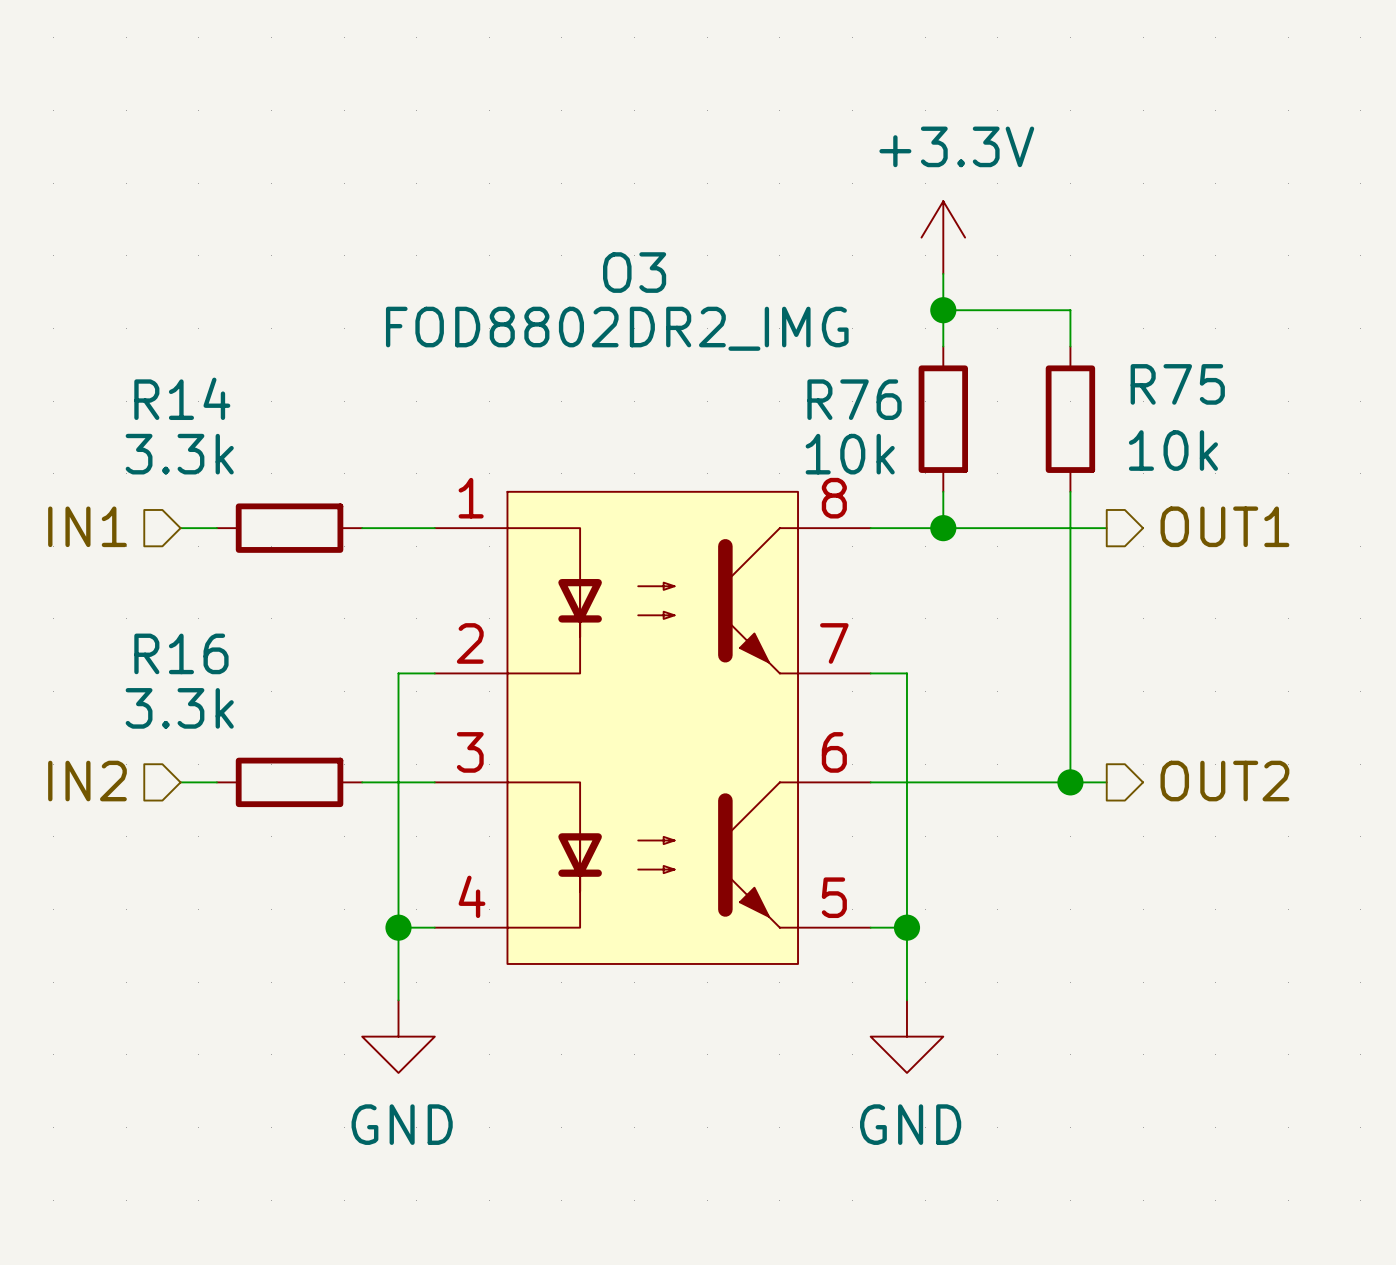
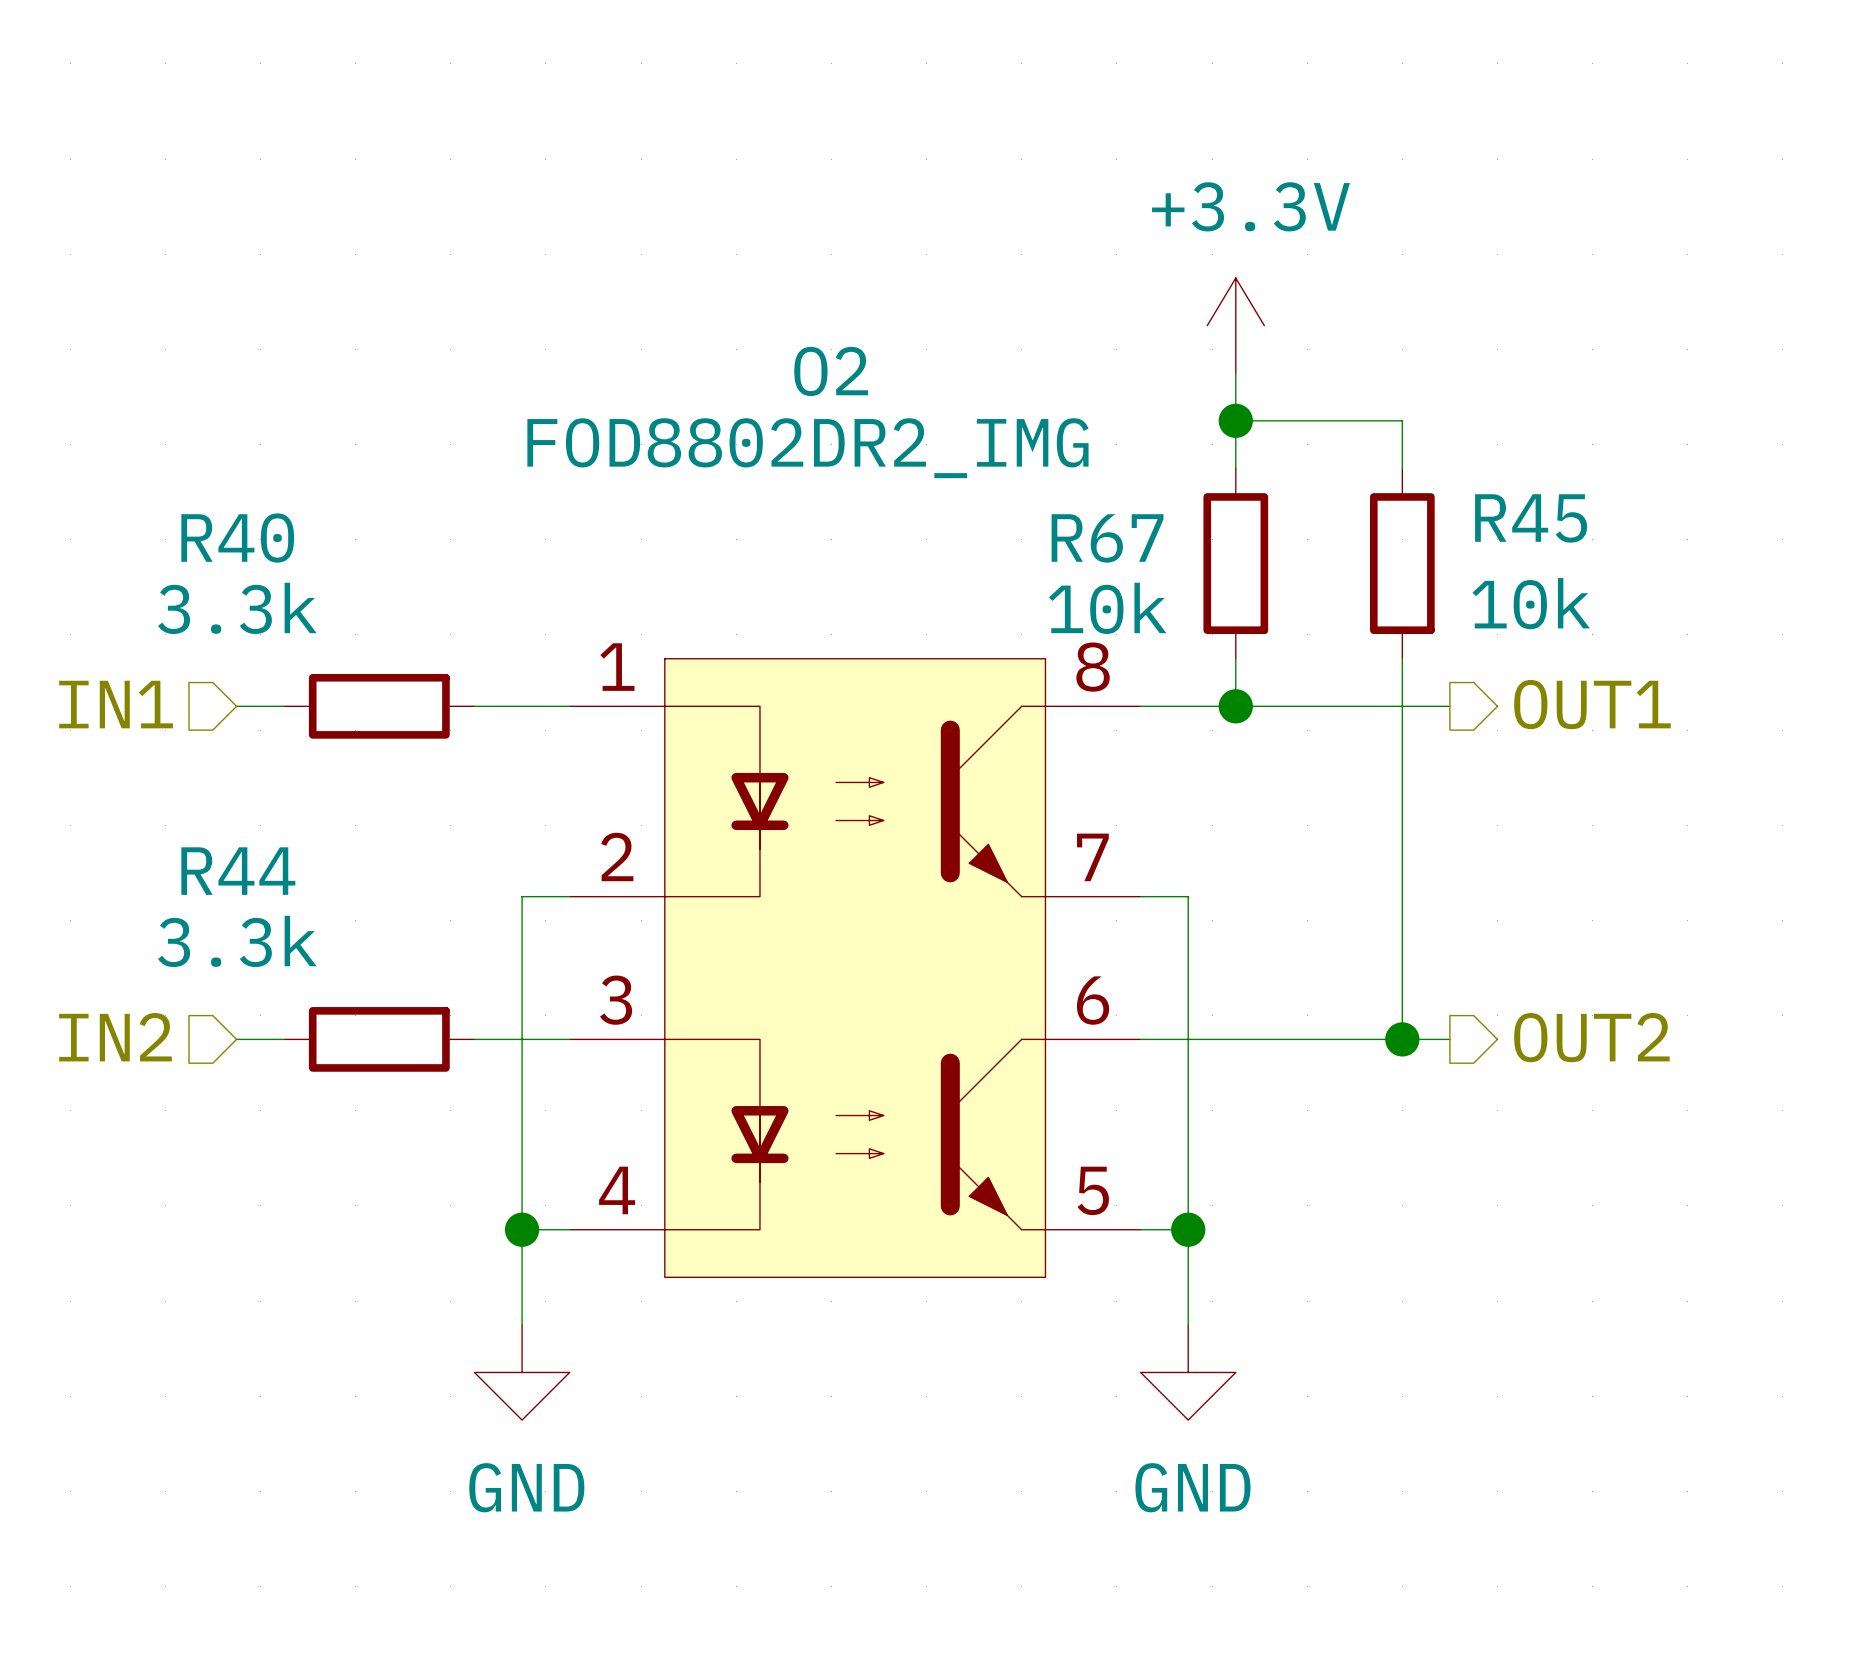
O3 name: O3 (634, 272) -> O2 (831, 371)
R75 name: R75 (1177, 384) -> R45 (1531, 518)
R14 name: R14 (182, 398) -> R40 (237, 538)
R76 name: R76 (854, 399) -> R67 (1107, 538)
R16 name: R16 (181, 653) -> R44 (238, 871)

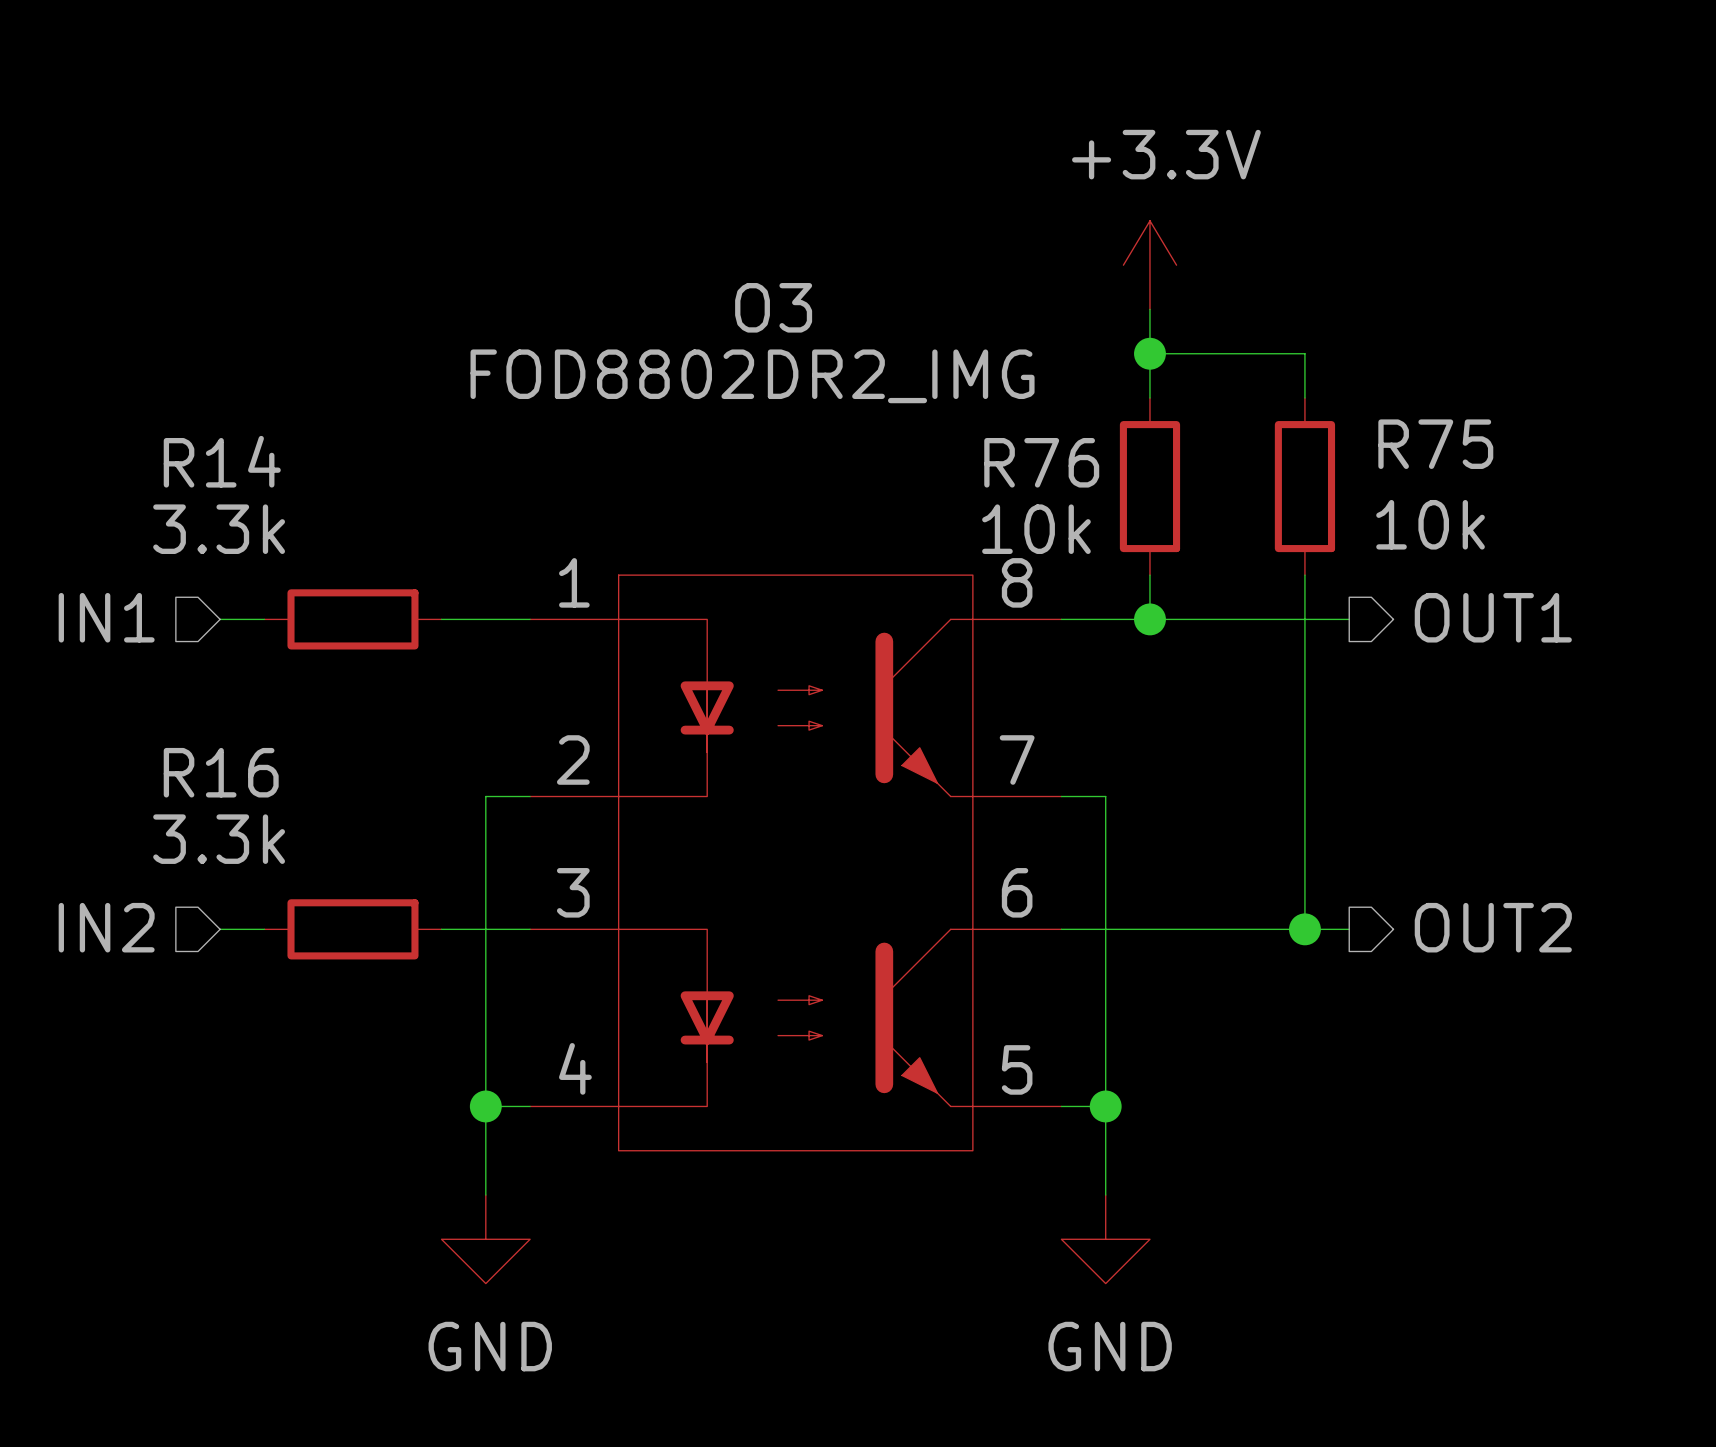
O2 name: O2 (831, 371) -> O3 (773, 307)
R45 name: R45 (1531, 518) -> R75 (1435, 444)
R40 name: R40 (237, 538) -> R14 (222, 461)
R67 name: R67 (1107, 538) -> R76 (1041, 462)
R44 name: R44 (238, 871) -> R16 (221, 772)

